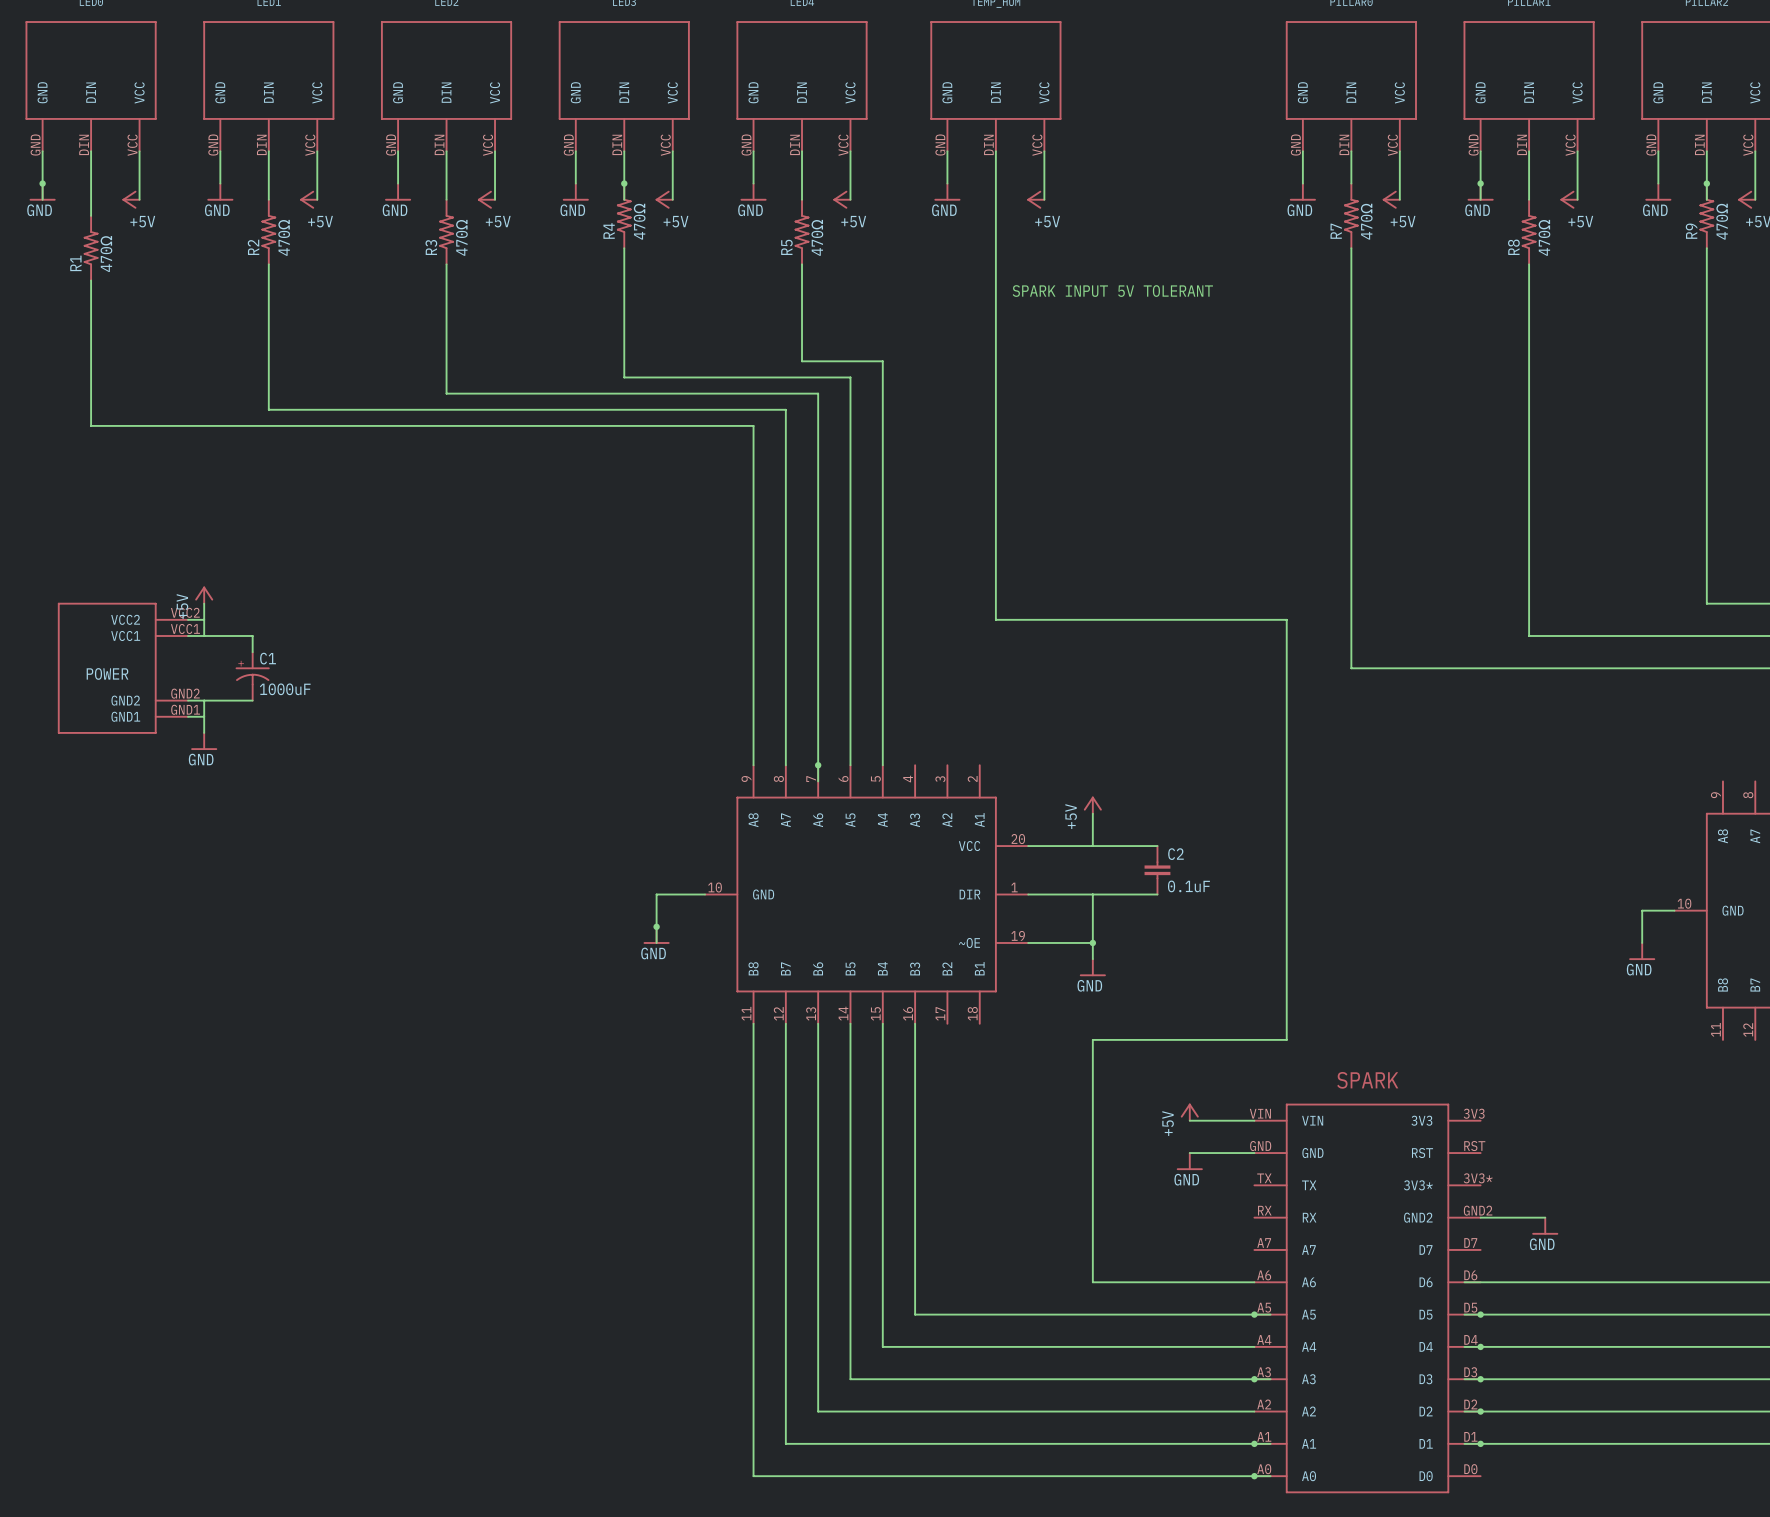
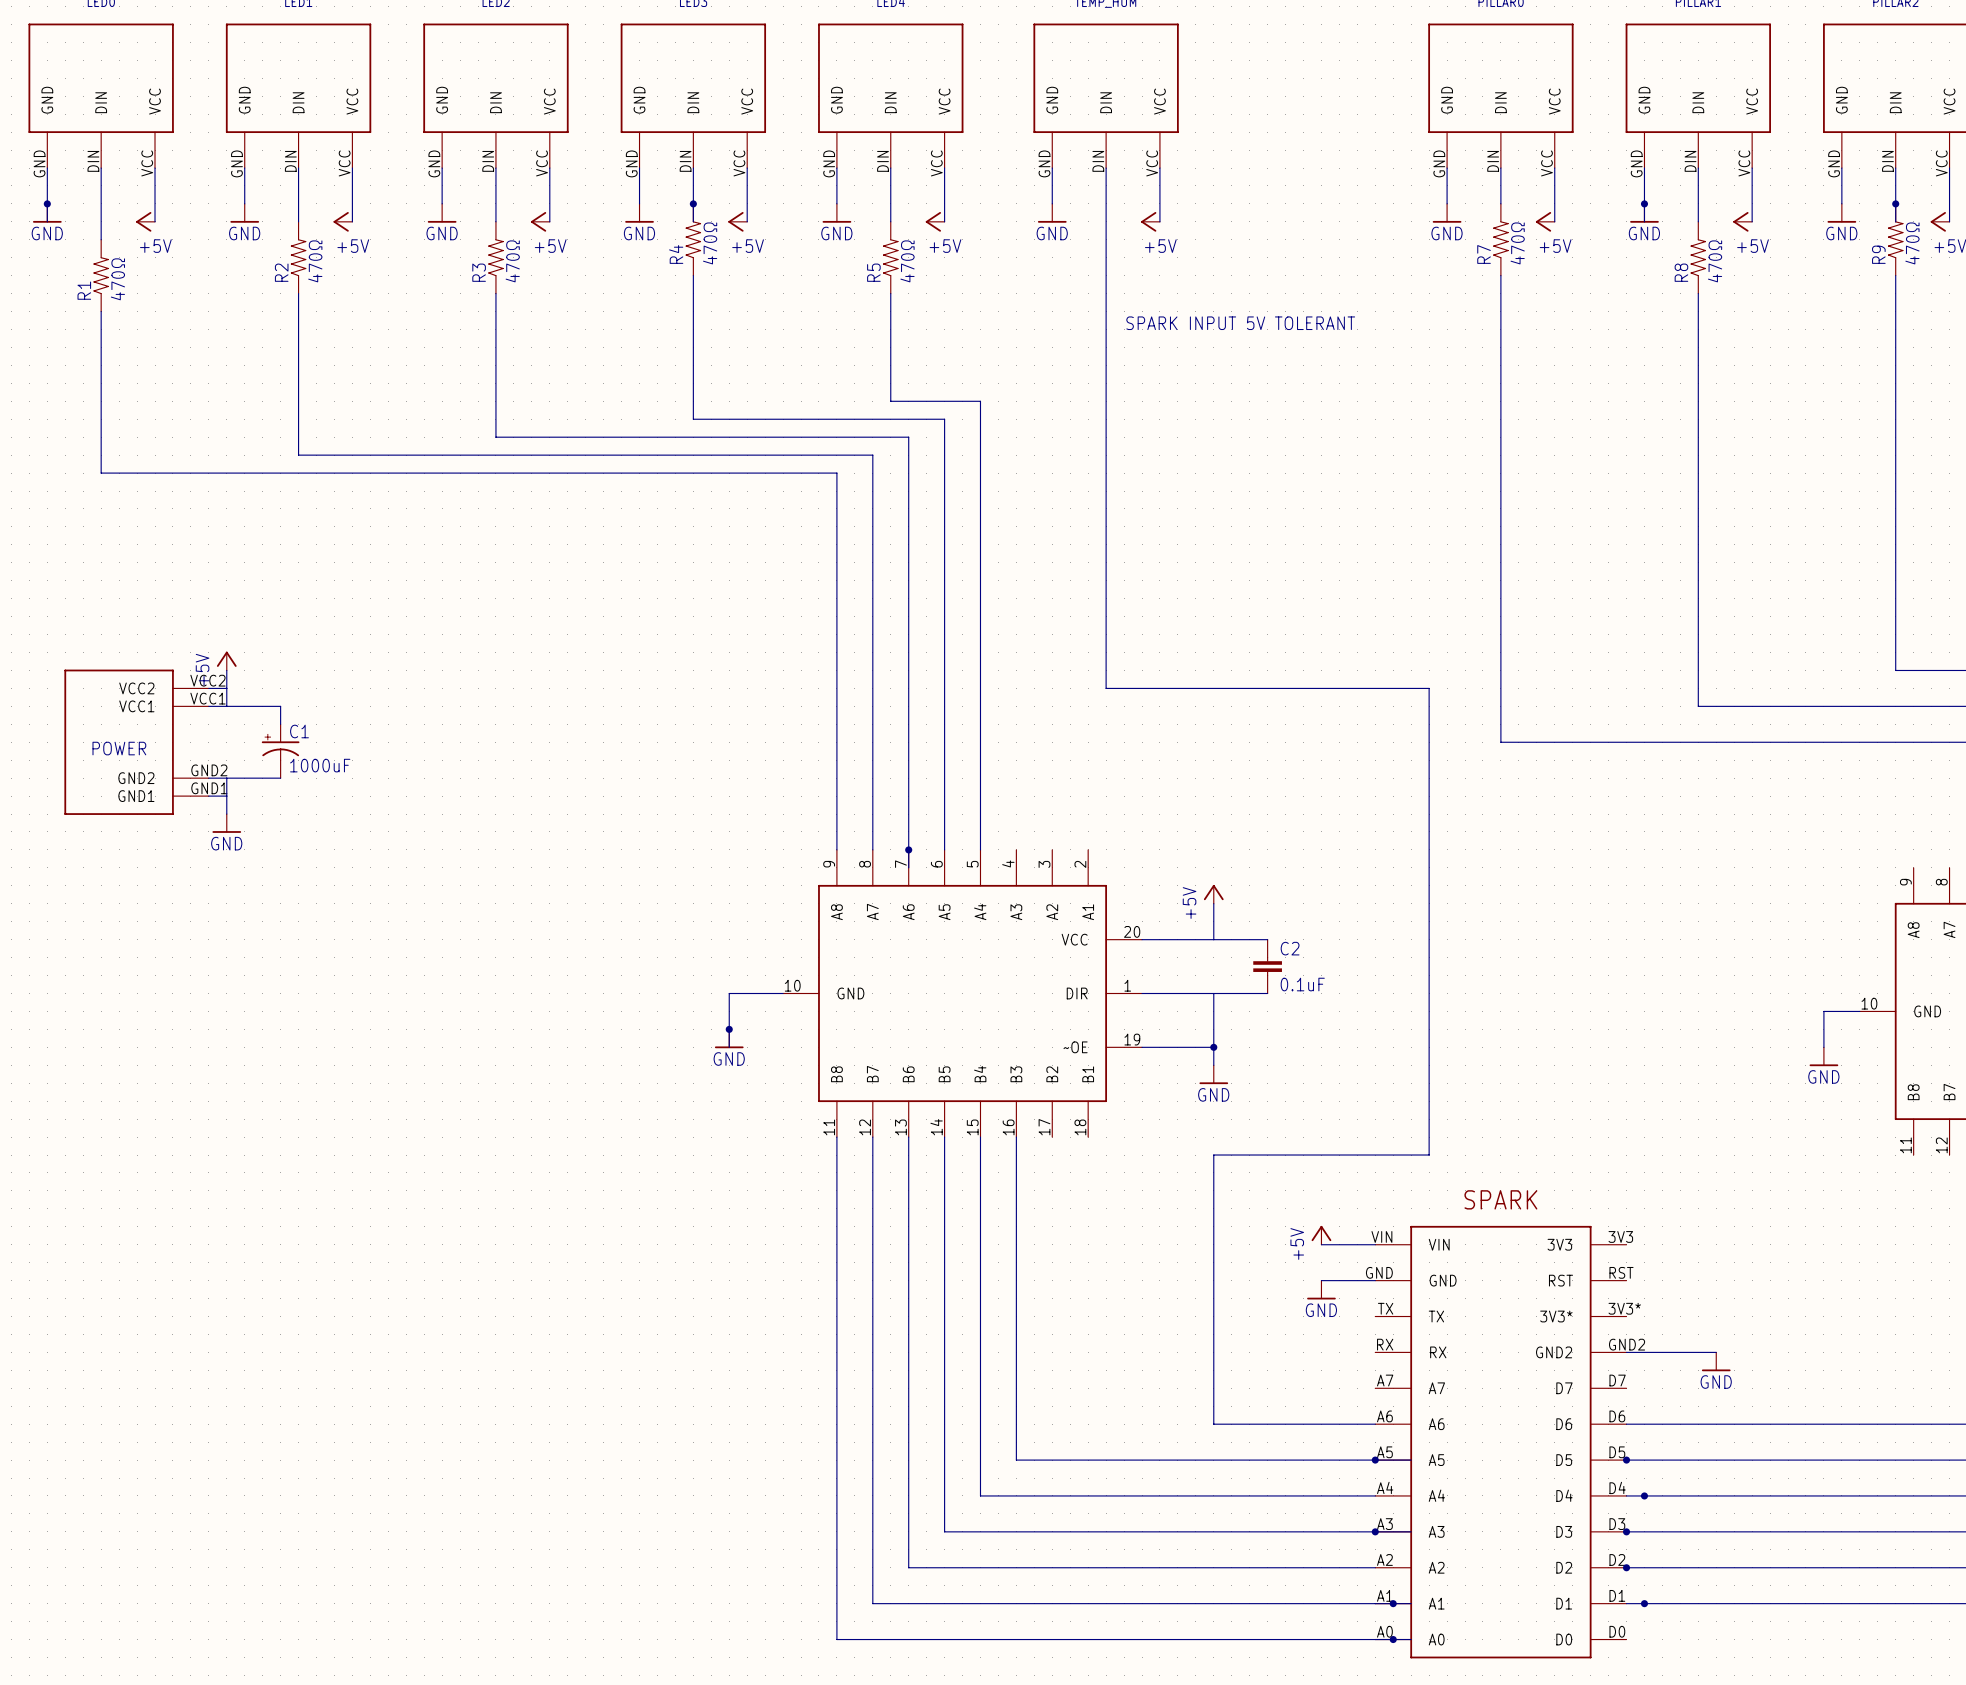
wire: (1141, 846) (1157, 846) -> none
C2 position: (1157, 870) -> (1267, 966)
wire: (1141, 894) (1157, 894) -> none
SPARK position: (1367, 1298) -> (1500, 1442)
junction position: (1254, 1314) -> (1375, 1460)
junction position: (1480, 1314) -> (1626, 1460)
junction position: (1254, 1379) -> (1375, 1531)
junction position: (1480, 1379) -> (1626, 1531)
junction position: (1480, 1411) -> (1626, 1567)

